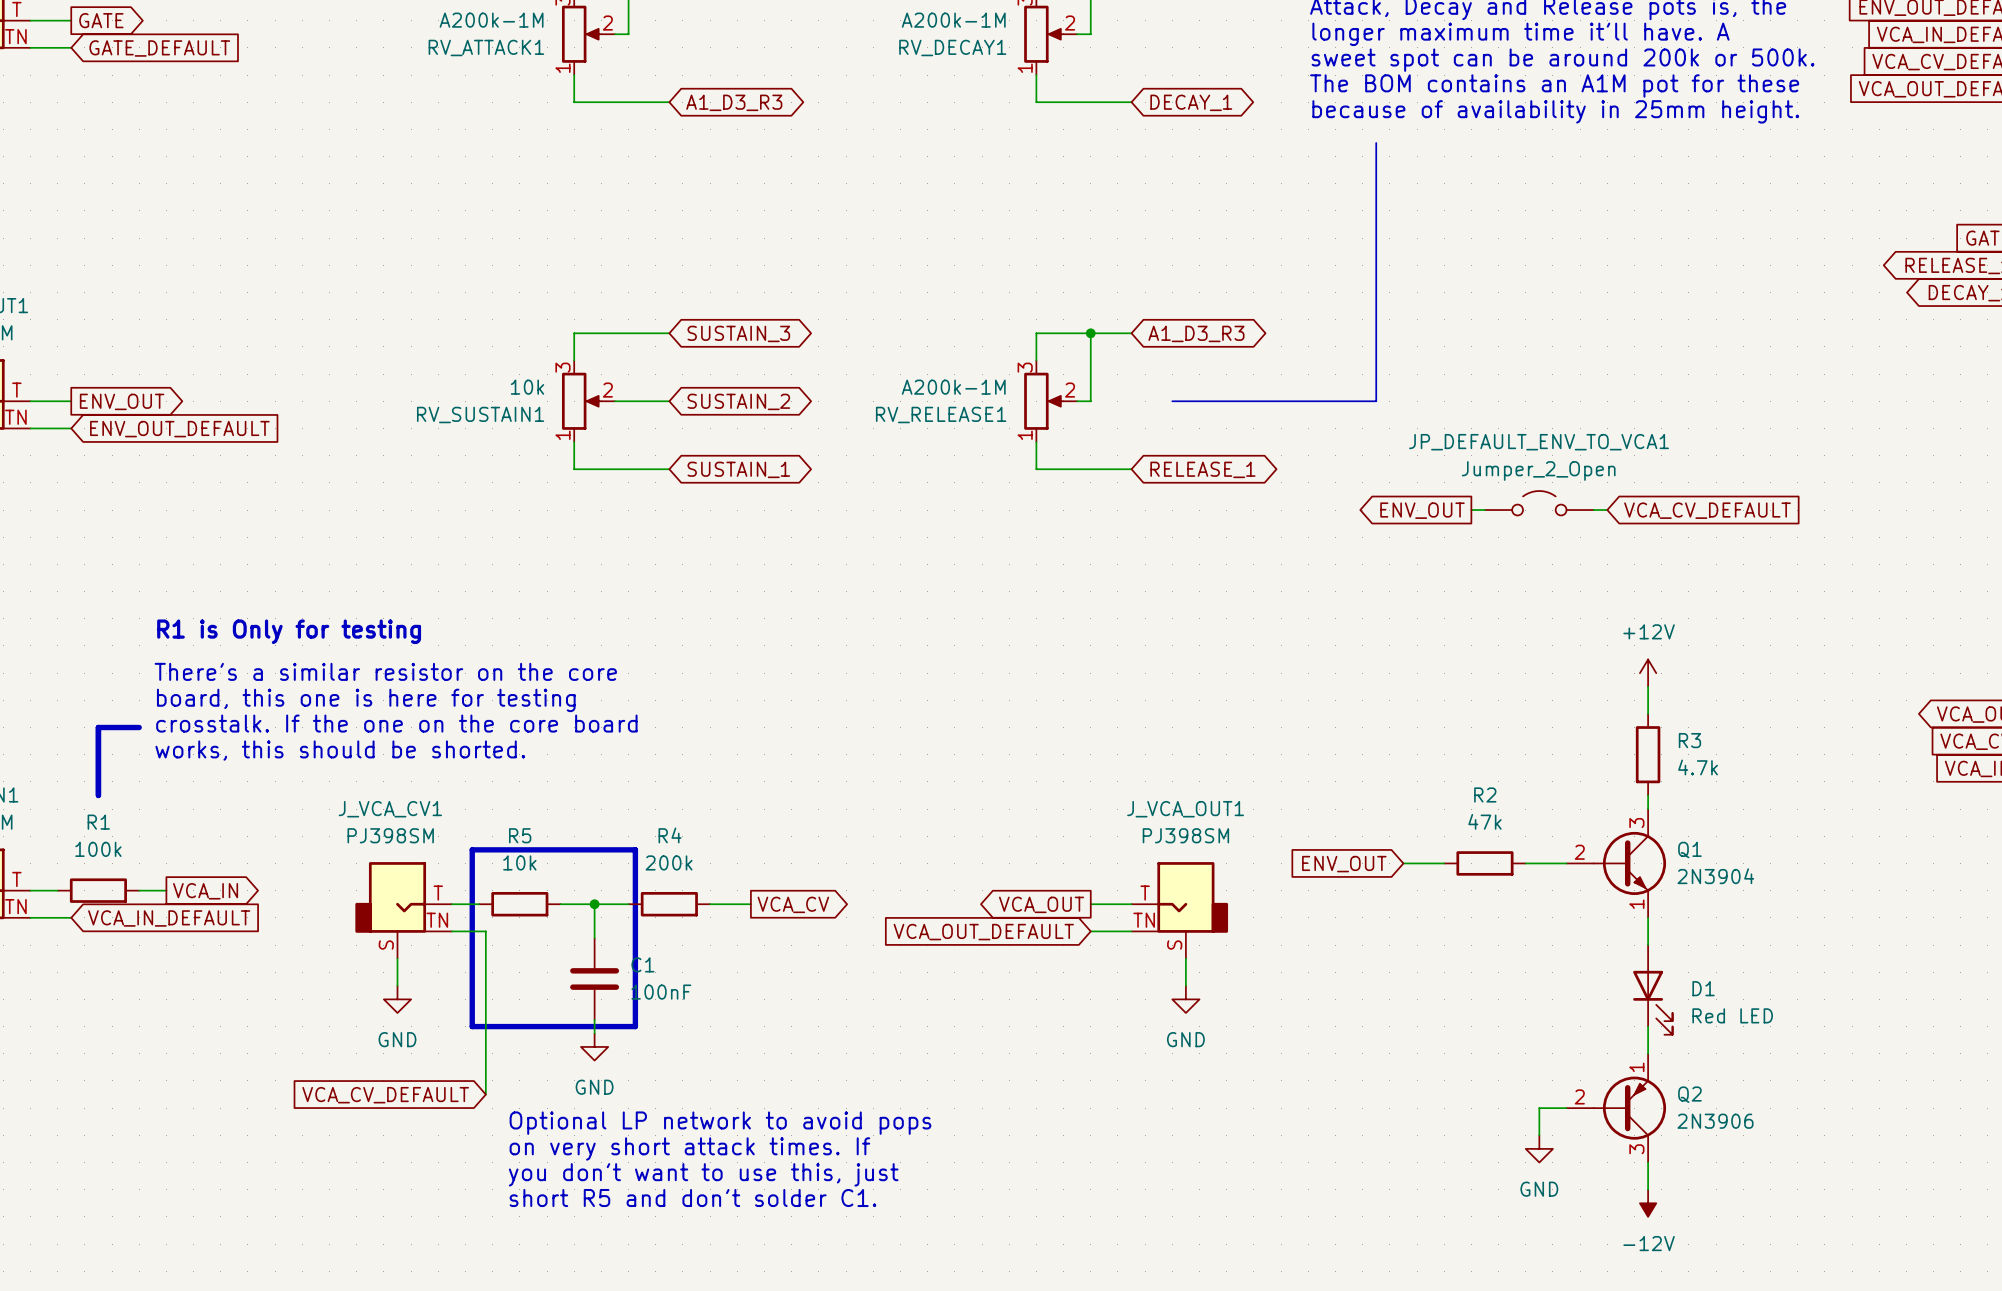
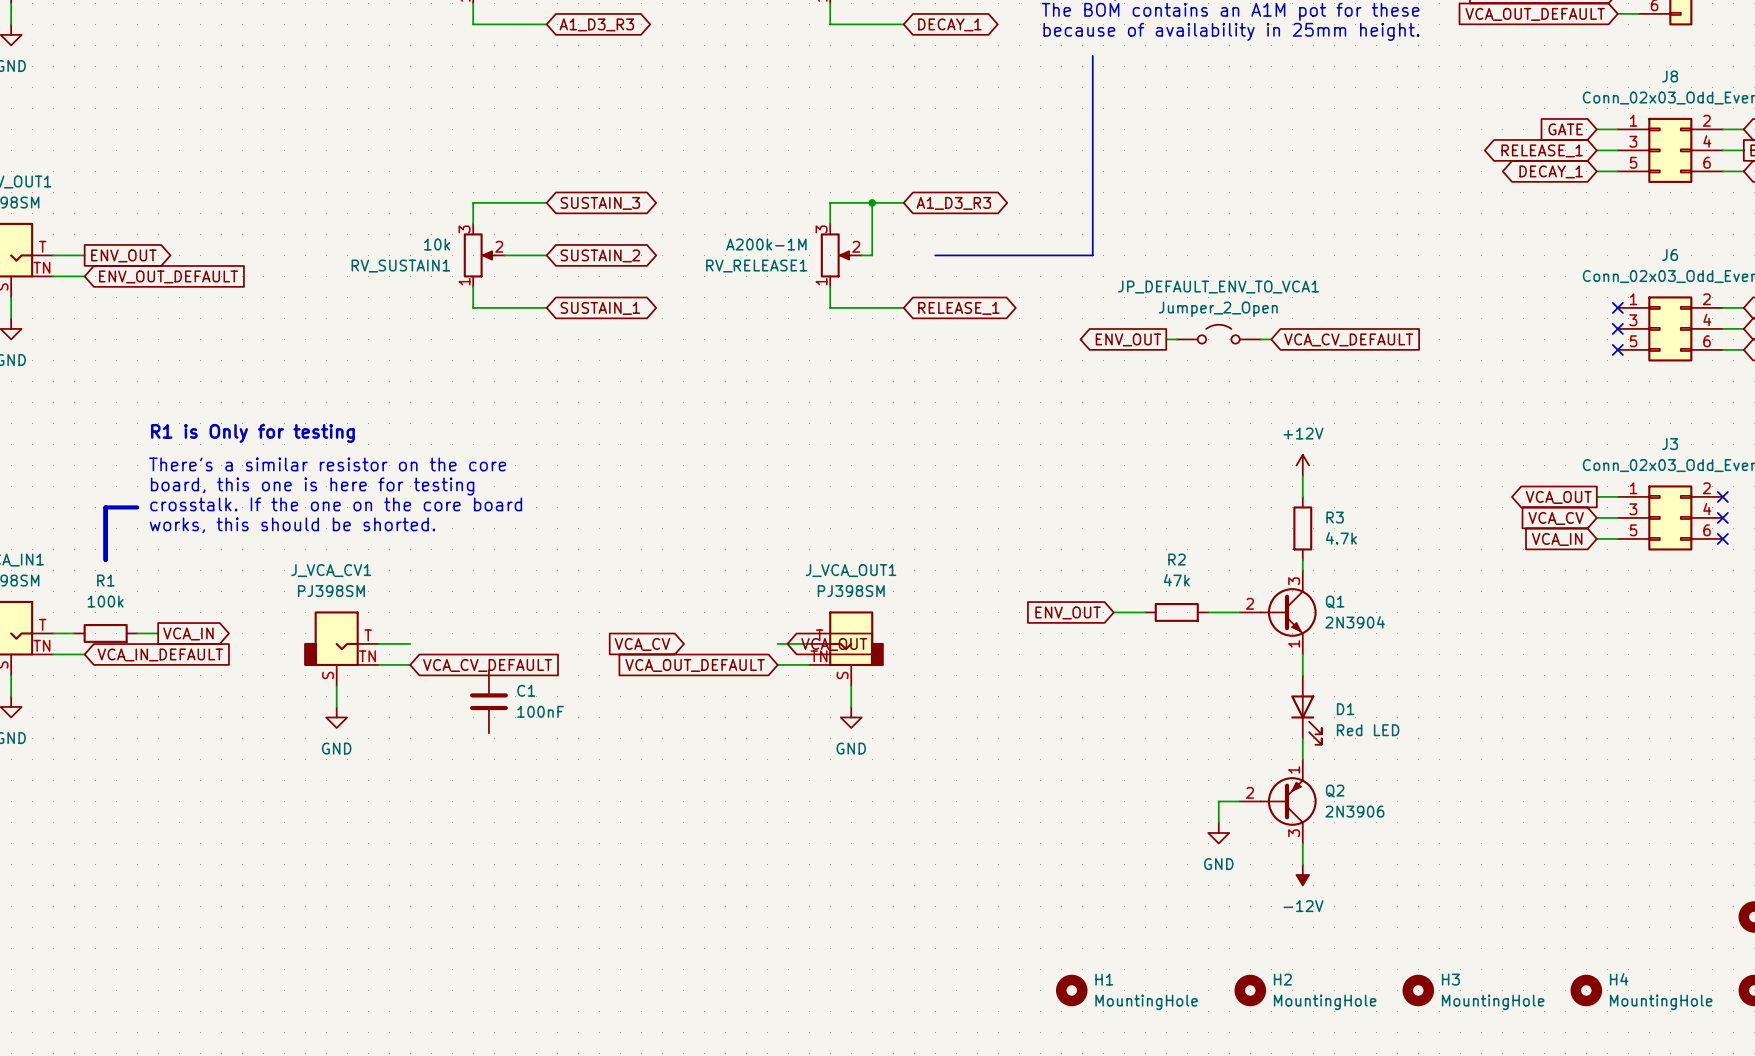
line: (472, 849) (635, 849) (635, 1026) (472, 1026) (472, 849) -> none
R5: 10k (519, 904) -> none
wire: (560, 904) (628, 904) -> none
wire: (594, 904) (594, 938) -> none
junction: (594, 904) -> none
R4: 200k (669, 904) -> none
wire: (710, 904) (750, 904) -> none
wire: (1090, 904) (1131, 904) -> (777, 643) (809, 643)
J_VCA_OUT1 position: (1179, 910) -> (846, 648)
wire: (485, 931) (485, 1094) -> (404, 664) (410, 664)
wire: (1090, 931) (1131, 931) -> (777, 664) (809, 664)
global label position: VCA_OUT_DEFAULT (983, 932) -> VCA_OUT_DEFAULT (695, 665)
wire: (1185, 958) (1185, 985) -> (851, 685) (851, 706)
power symbol position: GND (1185, 999) -> GND (851, 717)
wire: (594, 1019) (594, 1033) -> none
power symbol: GND (594, 1046) -> none
global label rotation: 0° (385, 1095) -> 180° (487, 665)
global label position: VCA_CV_DEFAULT (385, 1095) -> VCA_CV_DEFAULT (487, 665)
text: Optional LP network to avoid pops (720, 1123) -> none
text: on very short attack times. If (689, 1148) -> none
text: you don't want to use this, just (703, 1174) -> none
text: short R5 and don't solder C1. (692, 1198) -> none

